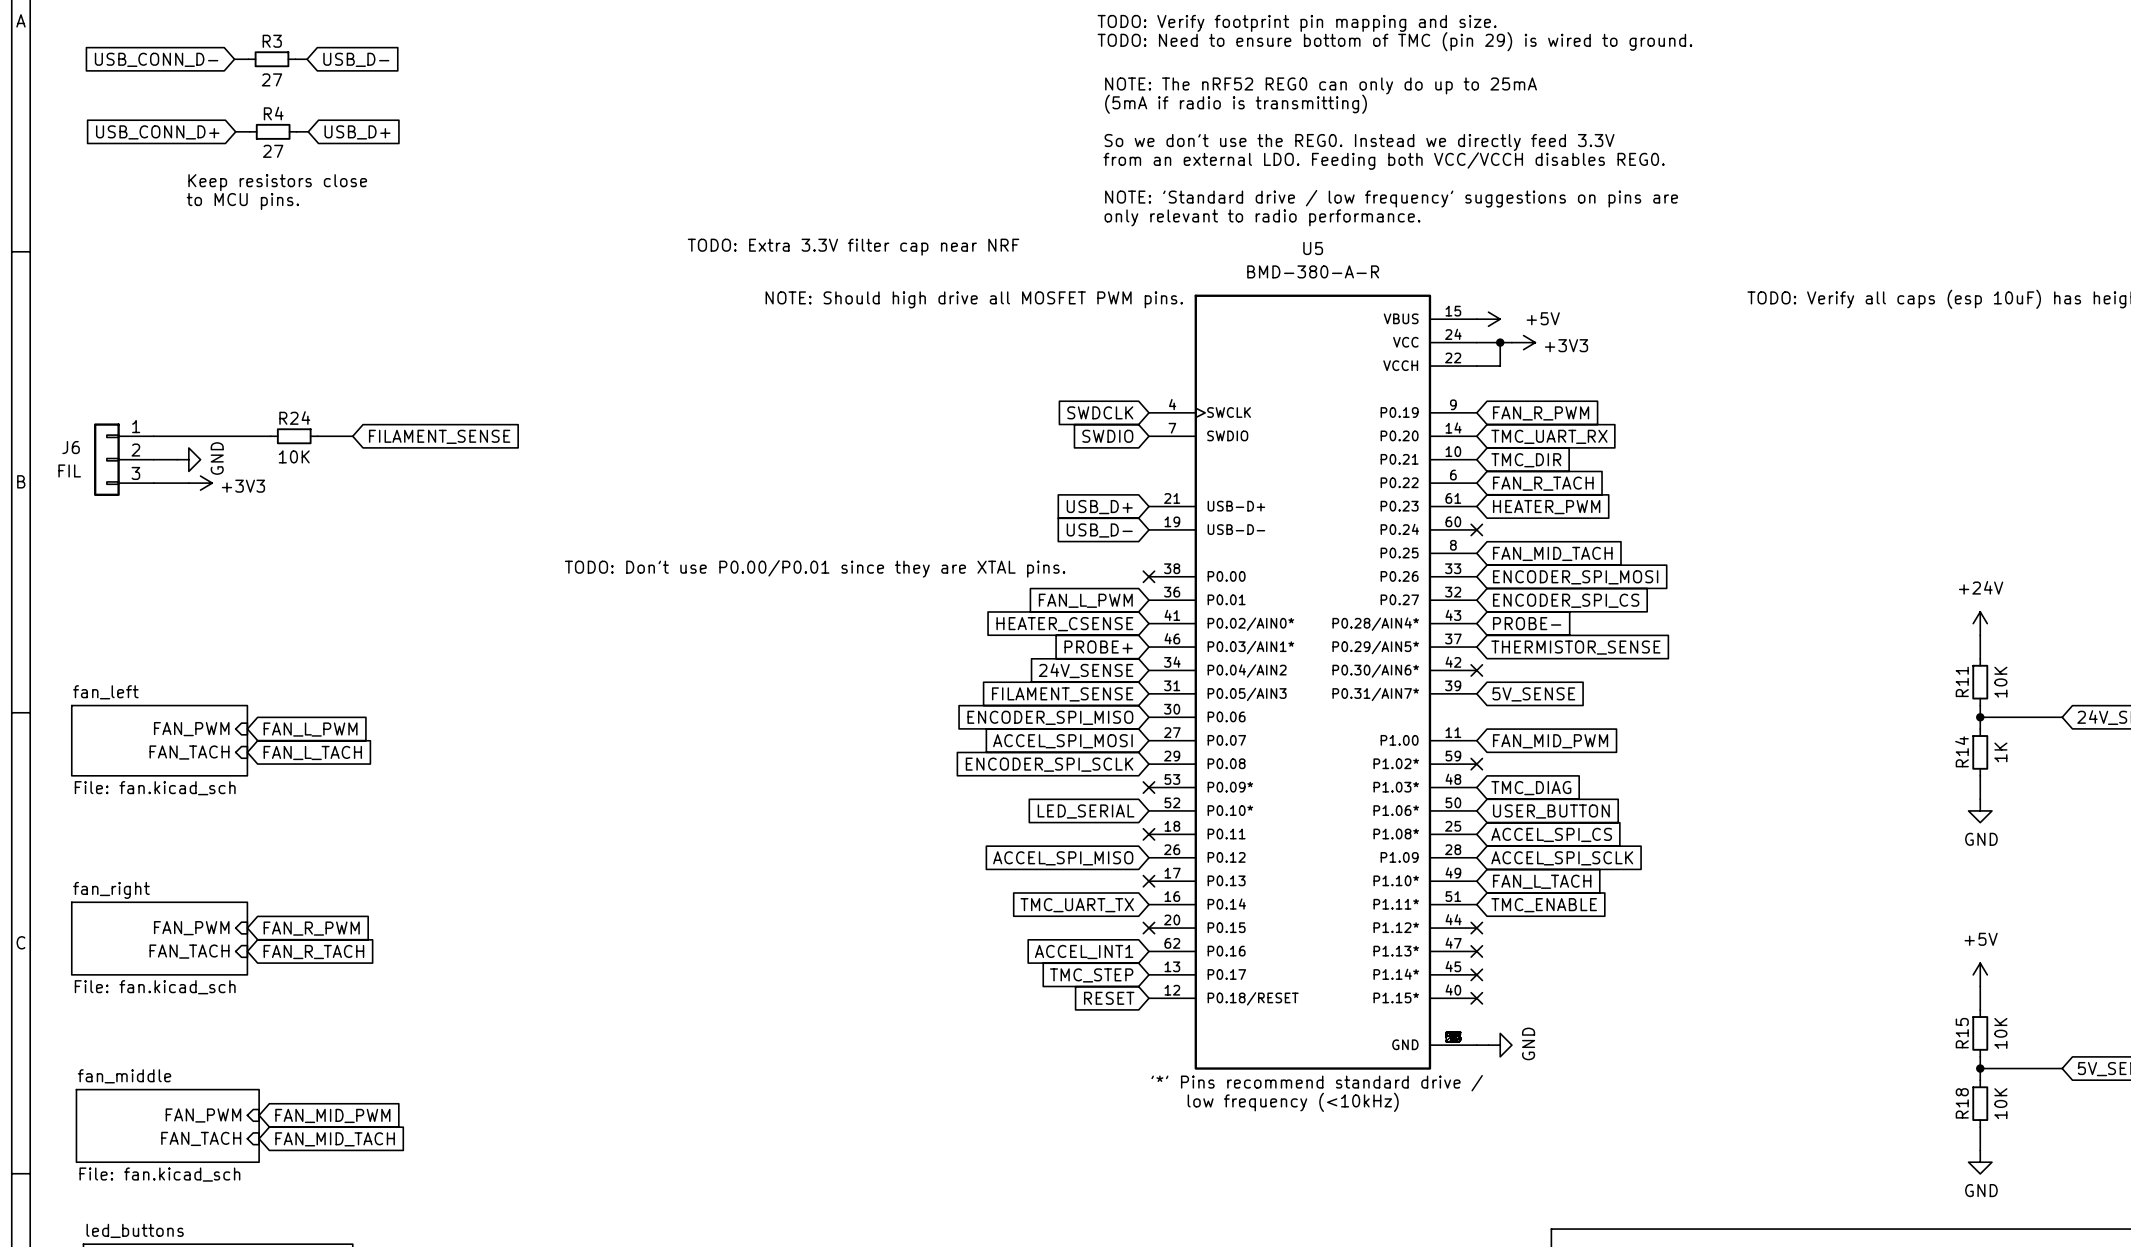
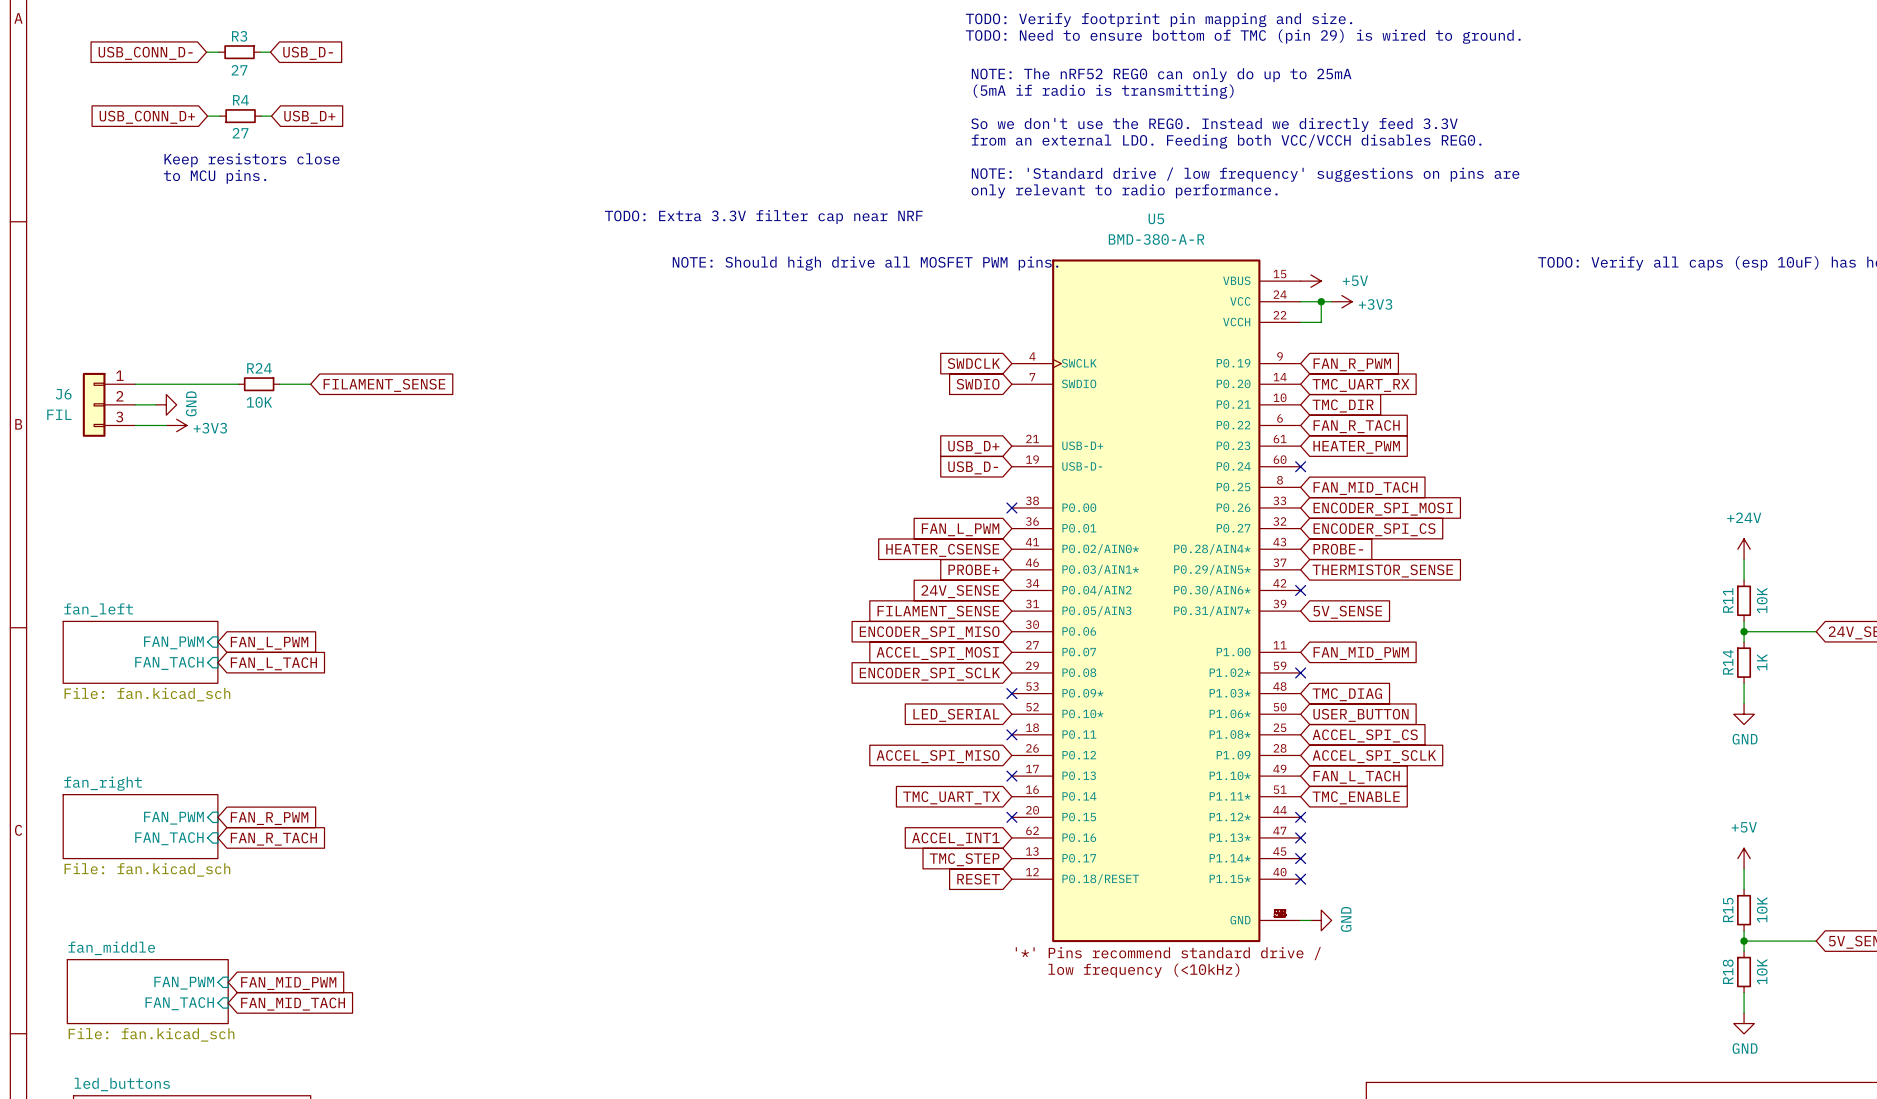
text: TODO: Don't use P0.00/P0.01 since they are XTAL pins. (815, 568) -> none

